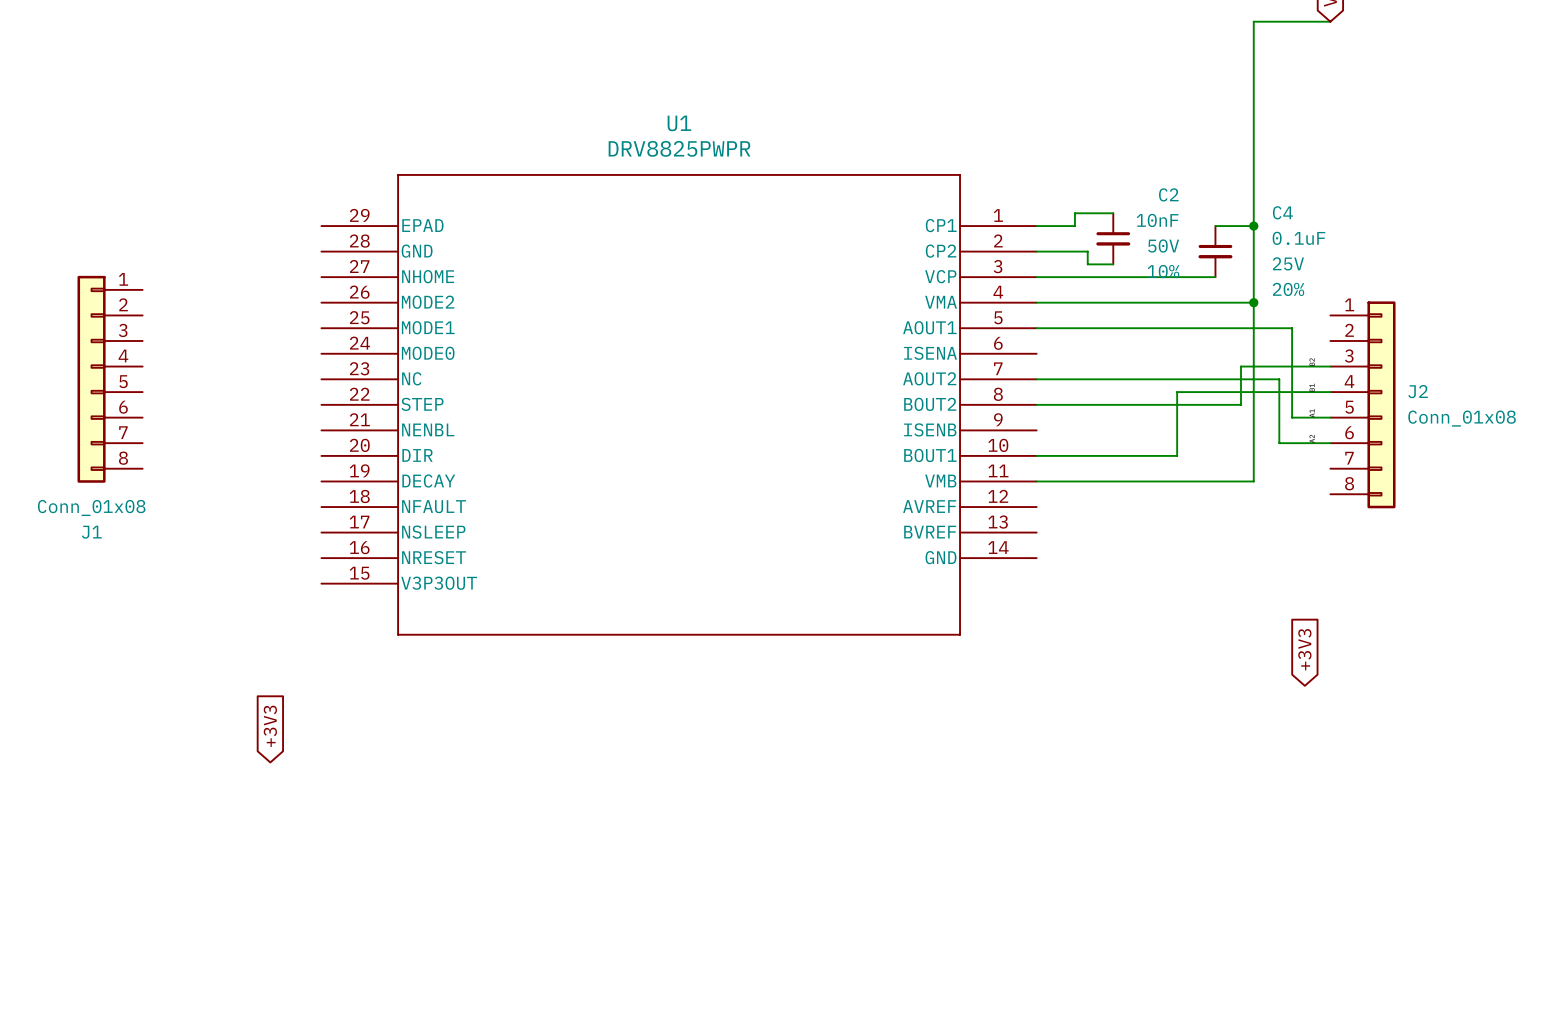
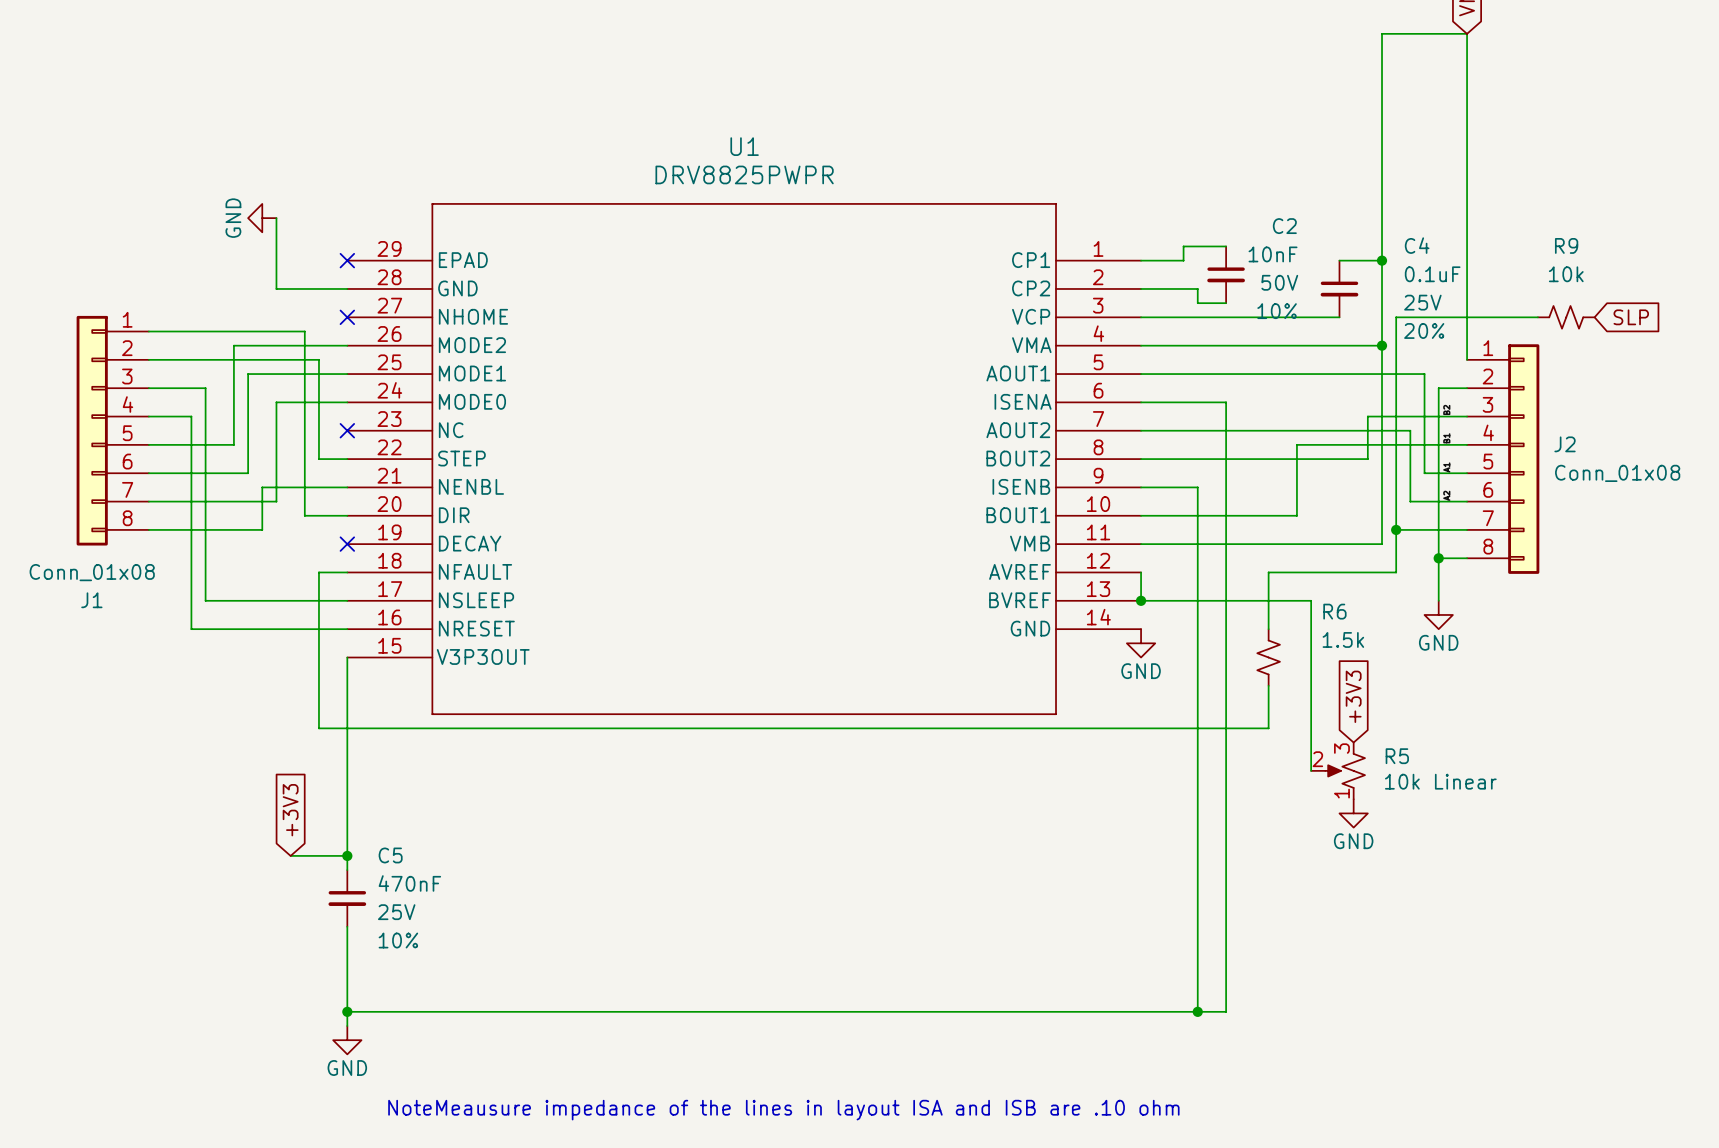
wire: none -> (1467, 33) (1467, 359)
power symbol: none -> GND (262, 218)
wire: none -> (276, 218) (276, 288) (347, 288)
no-connect mark: none -> (347, 260)
no-connect mark: none -> (347, 317)
wire: none -> (1537, 317) (1396, 317) (1396, 572) (1268, 572) (1268, 629)
R9: none -> 10k (1566, 317)
global label: none -> SLP (1631, 317)
wire: none -> (148, 331) (304, 331) (304, 515) (347, 515)
wire: none -> (347, 345) (233, 345) (233, 444) (148, 444)
wire: none -> (148, 359) (318, 359) (318, 459) (347, 459)
wire: none -> (347, 374) (248, 374) (248, 473) (148, 473)
wire: none -> (148, 388) (205, 388) (205, 600) (347, 600)
wire: none -> (1467, 388) (1438, 388) (1438, 600)
wire: none -> (347, 402) (276, 402) (276, 501) (148, 501)
wire: none -> (1141, 402) (1226, 402) (1226, 1011) (347, 1011)
wire: none -> (148, 416) (191, 416) (191, 629) (347, 629)
no-connect mark: none -> (347, 430)
wire: none -> (347, 487) (262, 487) (262, 529) (148, 529)
wire: none -> (1141, 487) (1197, 487) (1197, 1011)
wire: none -> (1396, 529) (1467, 529)
junction: none -> (1396, 529)
no-connect mark: none -> (347, 544)
wire: none -> (1438, 558) (1467, 558)
junction: none -> (1438, 558)
wire: none -> (347, 572) (318, 572) (318, 728) (1268, 728) (1268, 685)
wire: none -> (1141, 572) (1141, 600) (1311, 600) (1311, 770)
junction: none -> (1141, 600)
power symbol: none -> GND (1438, 614)
power symbol: none -> GND (1141, 643)
wire: none -> (347, 657) (347, 870)
R6: none -> 1.5k (1268, 657)
global label position: +3V3 (1304, 649) -> +3V3 (1353, 696)
R5: none -> 10k Linear (1338, 770)
power symbol: none -> GND (1353, 813)
wire: none -> (290, 855) (347, 855)
junction: none -> (347, 855)
C5: none -> 470nF (347, 898)
wire: none -> (347, 926) (347, 1026)
junction: none -> (347, 1011)
junction: none -> (1197, 1011)
power symbol: none -> GND (347, 1040)
text: none -> NoteMeausure impedance of the lines in layout ISA and ISB are .10 ohm (783, 1110)

